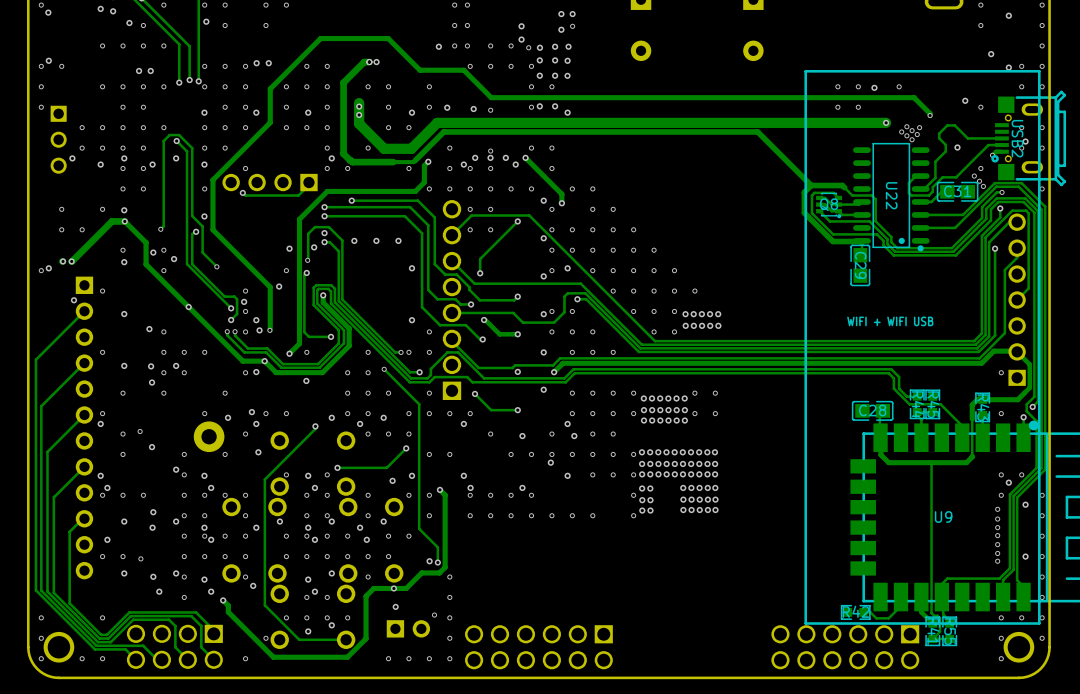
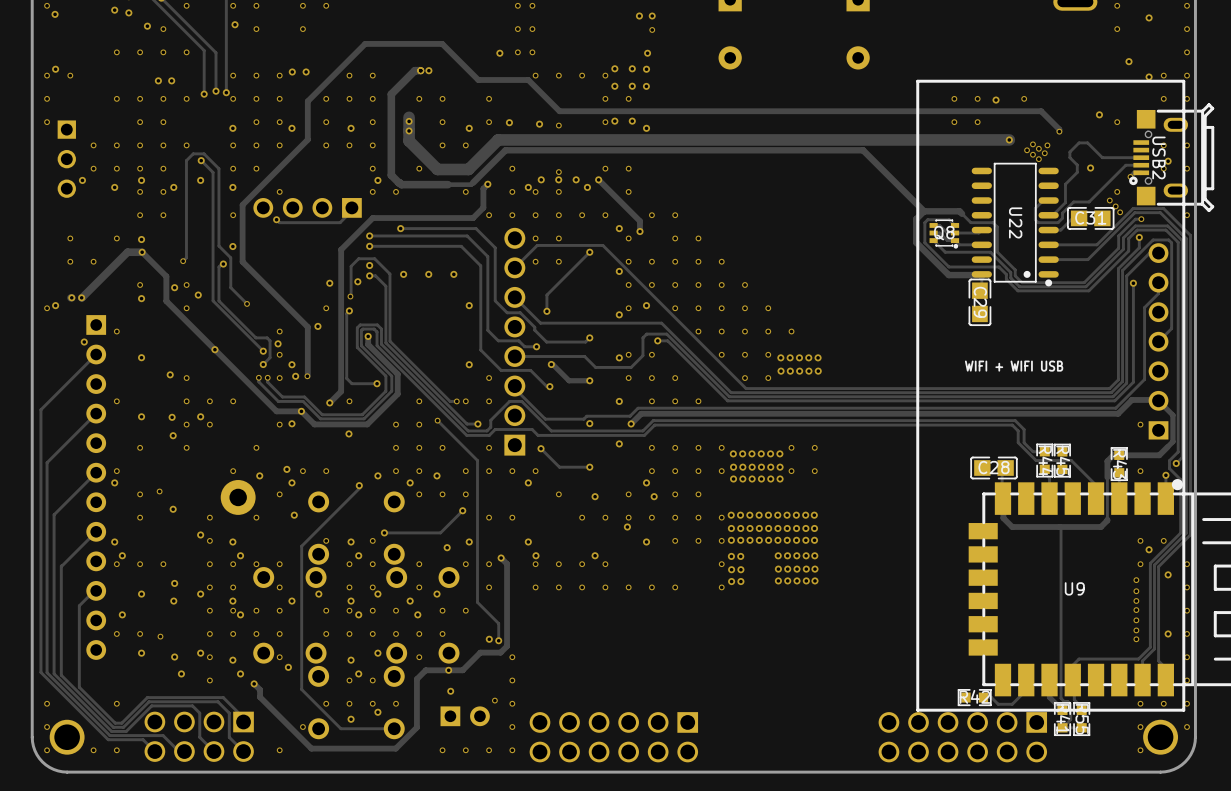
via: (521, 26) -> none
via: (561, 29) -> none
via: (521, 39) -> none
via: (490, 45) -> none
via: (511, 45) -> none
via: (555, 46) -> none
via: (528, 47) -> none
via: (539, 47) -> none

